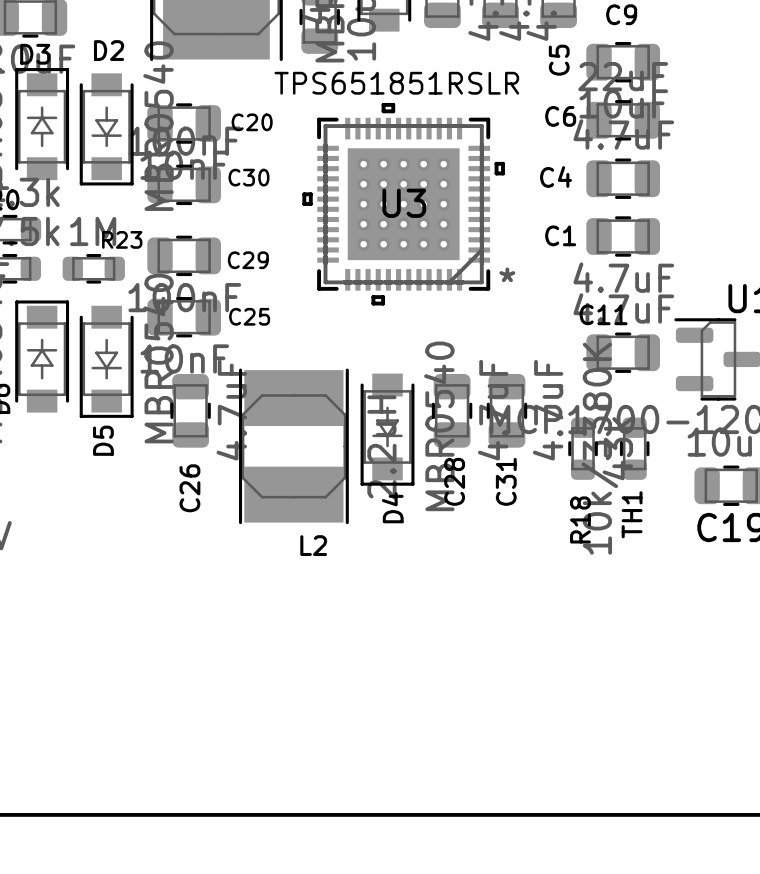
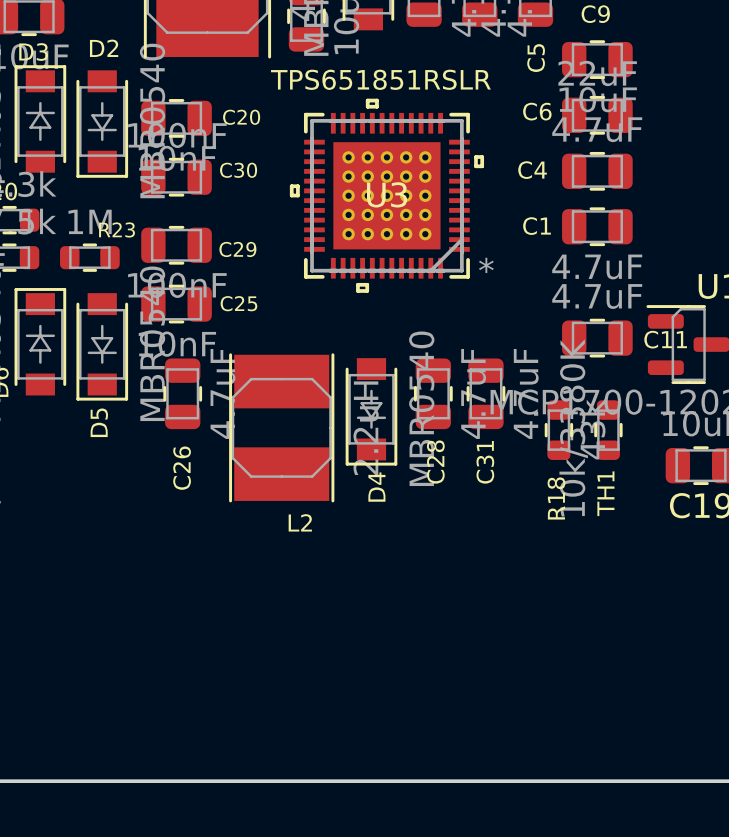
C11 name position: C11 (603, 314) -> C11 (665, 339)

